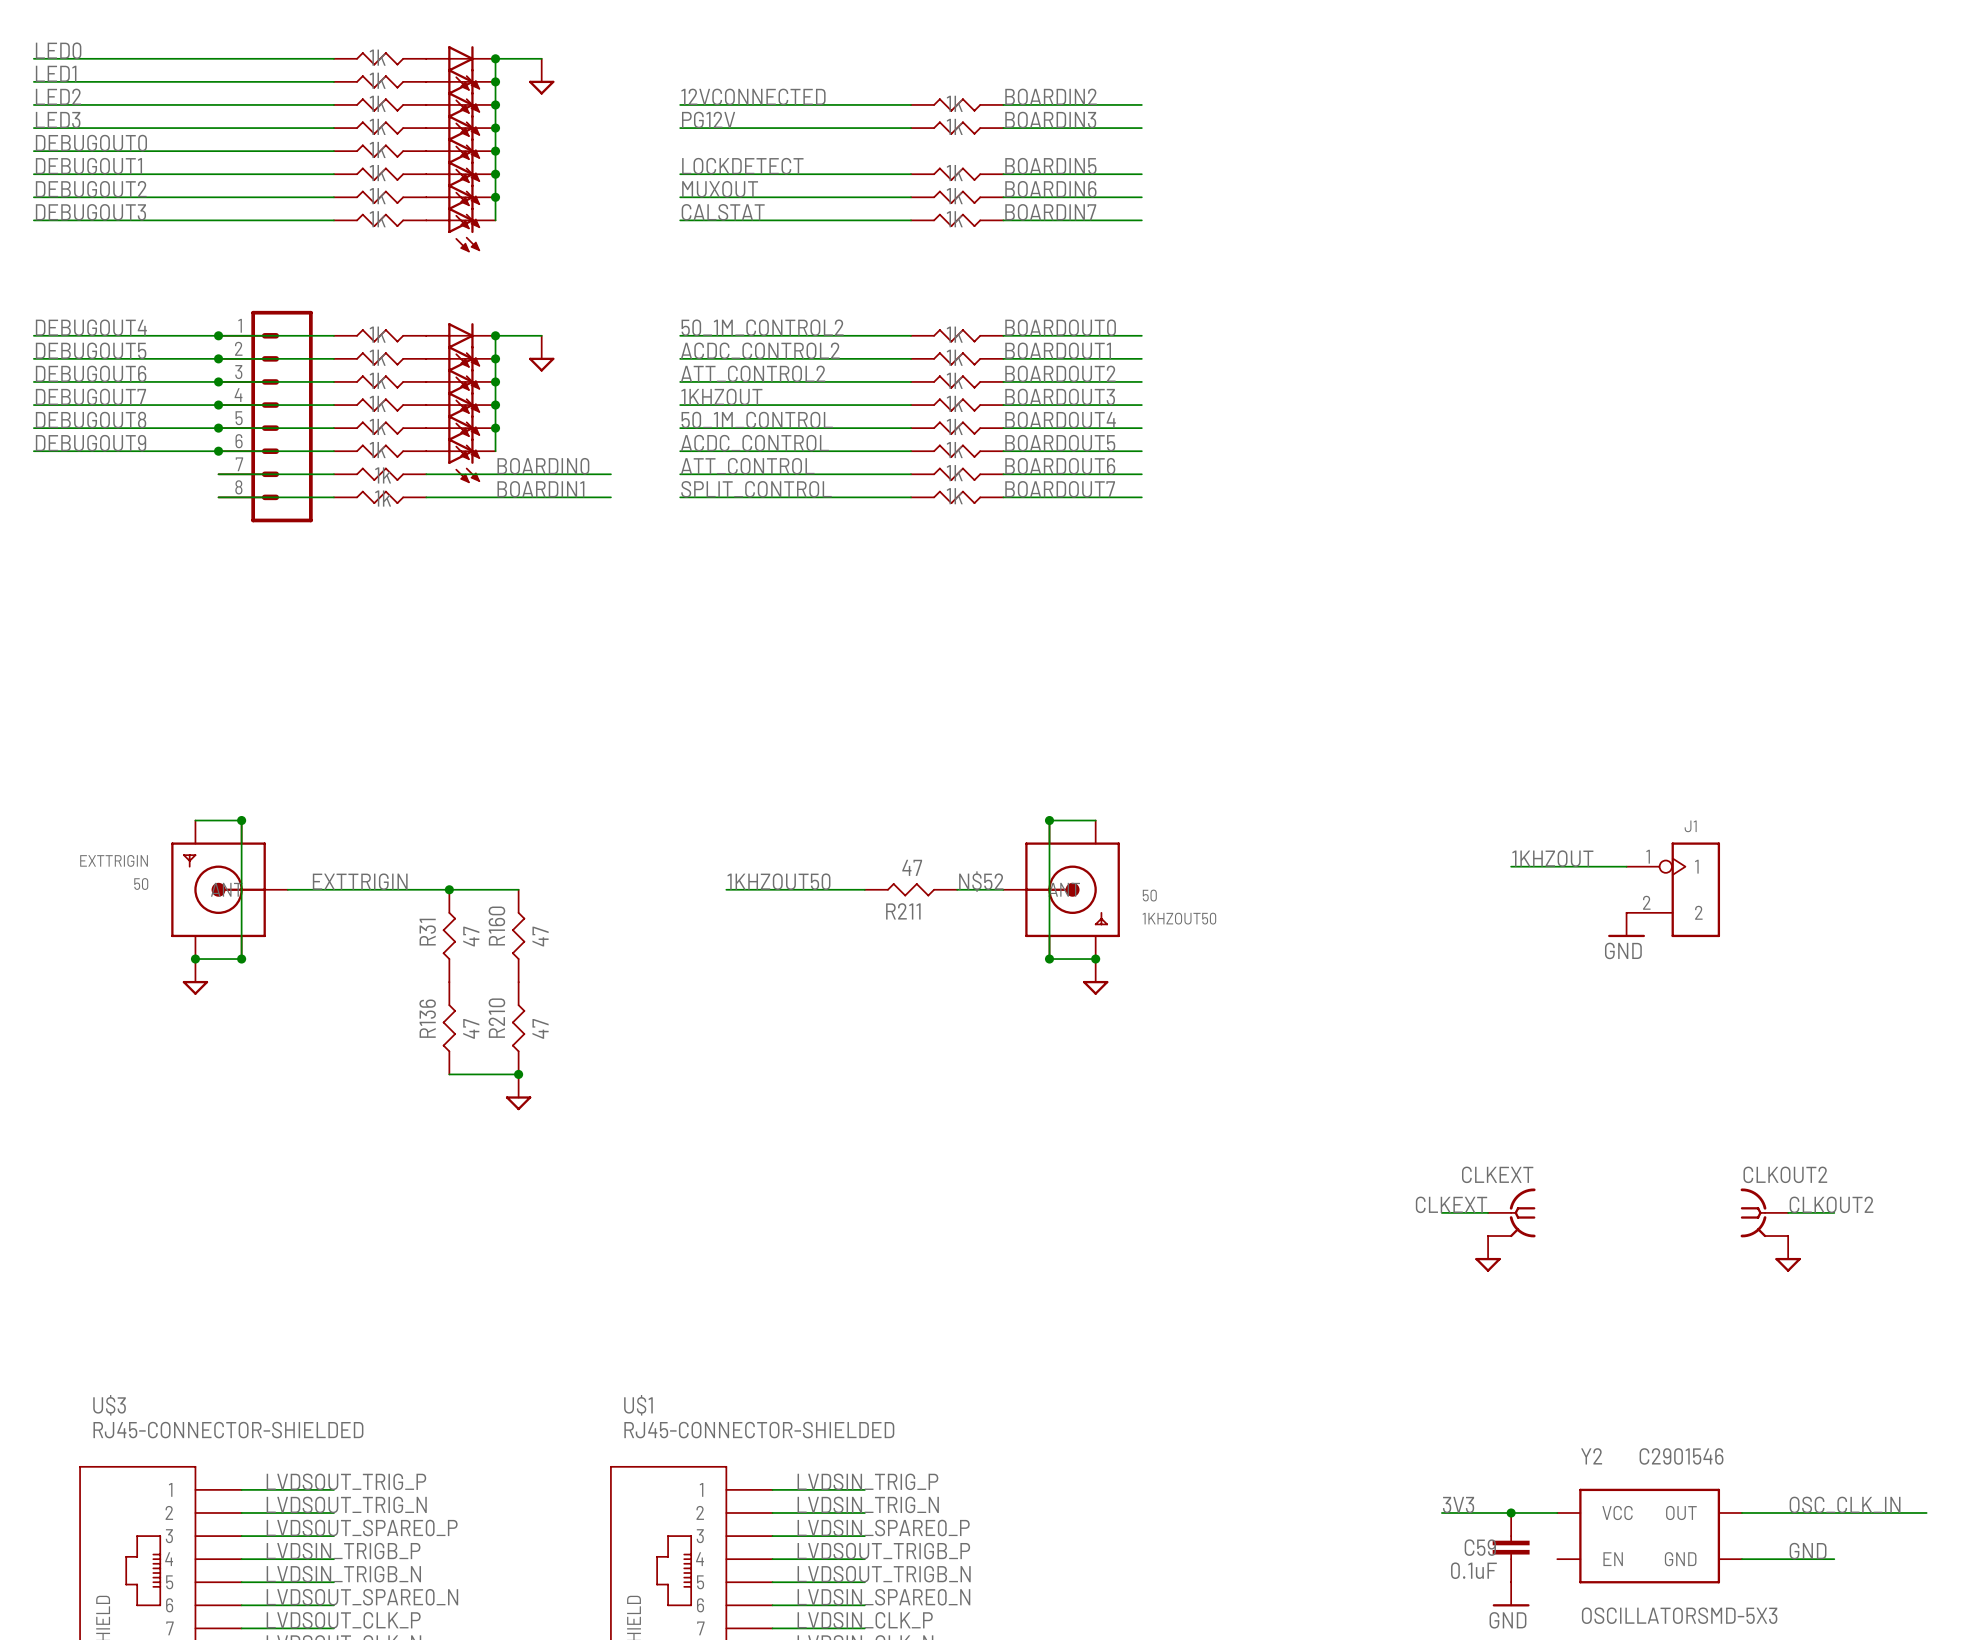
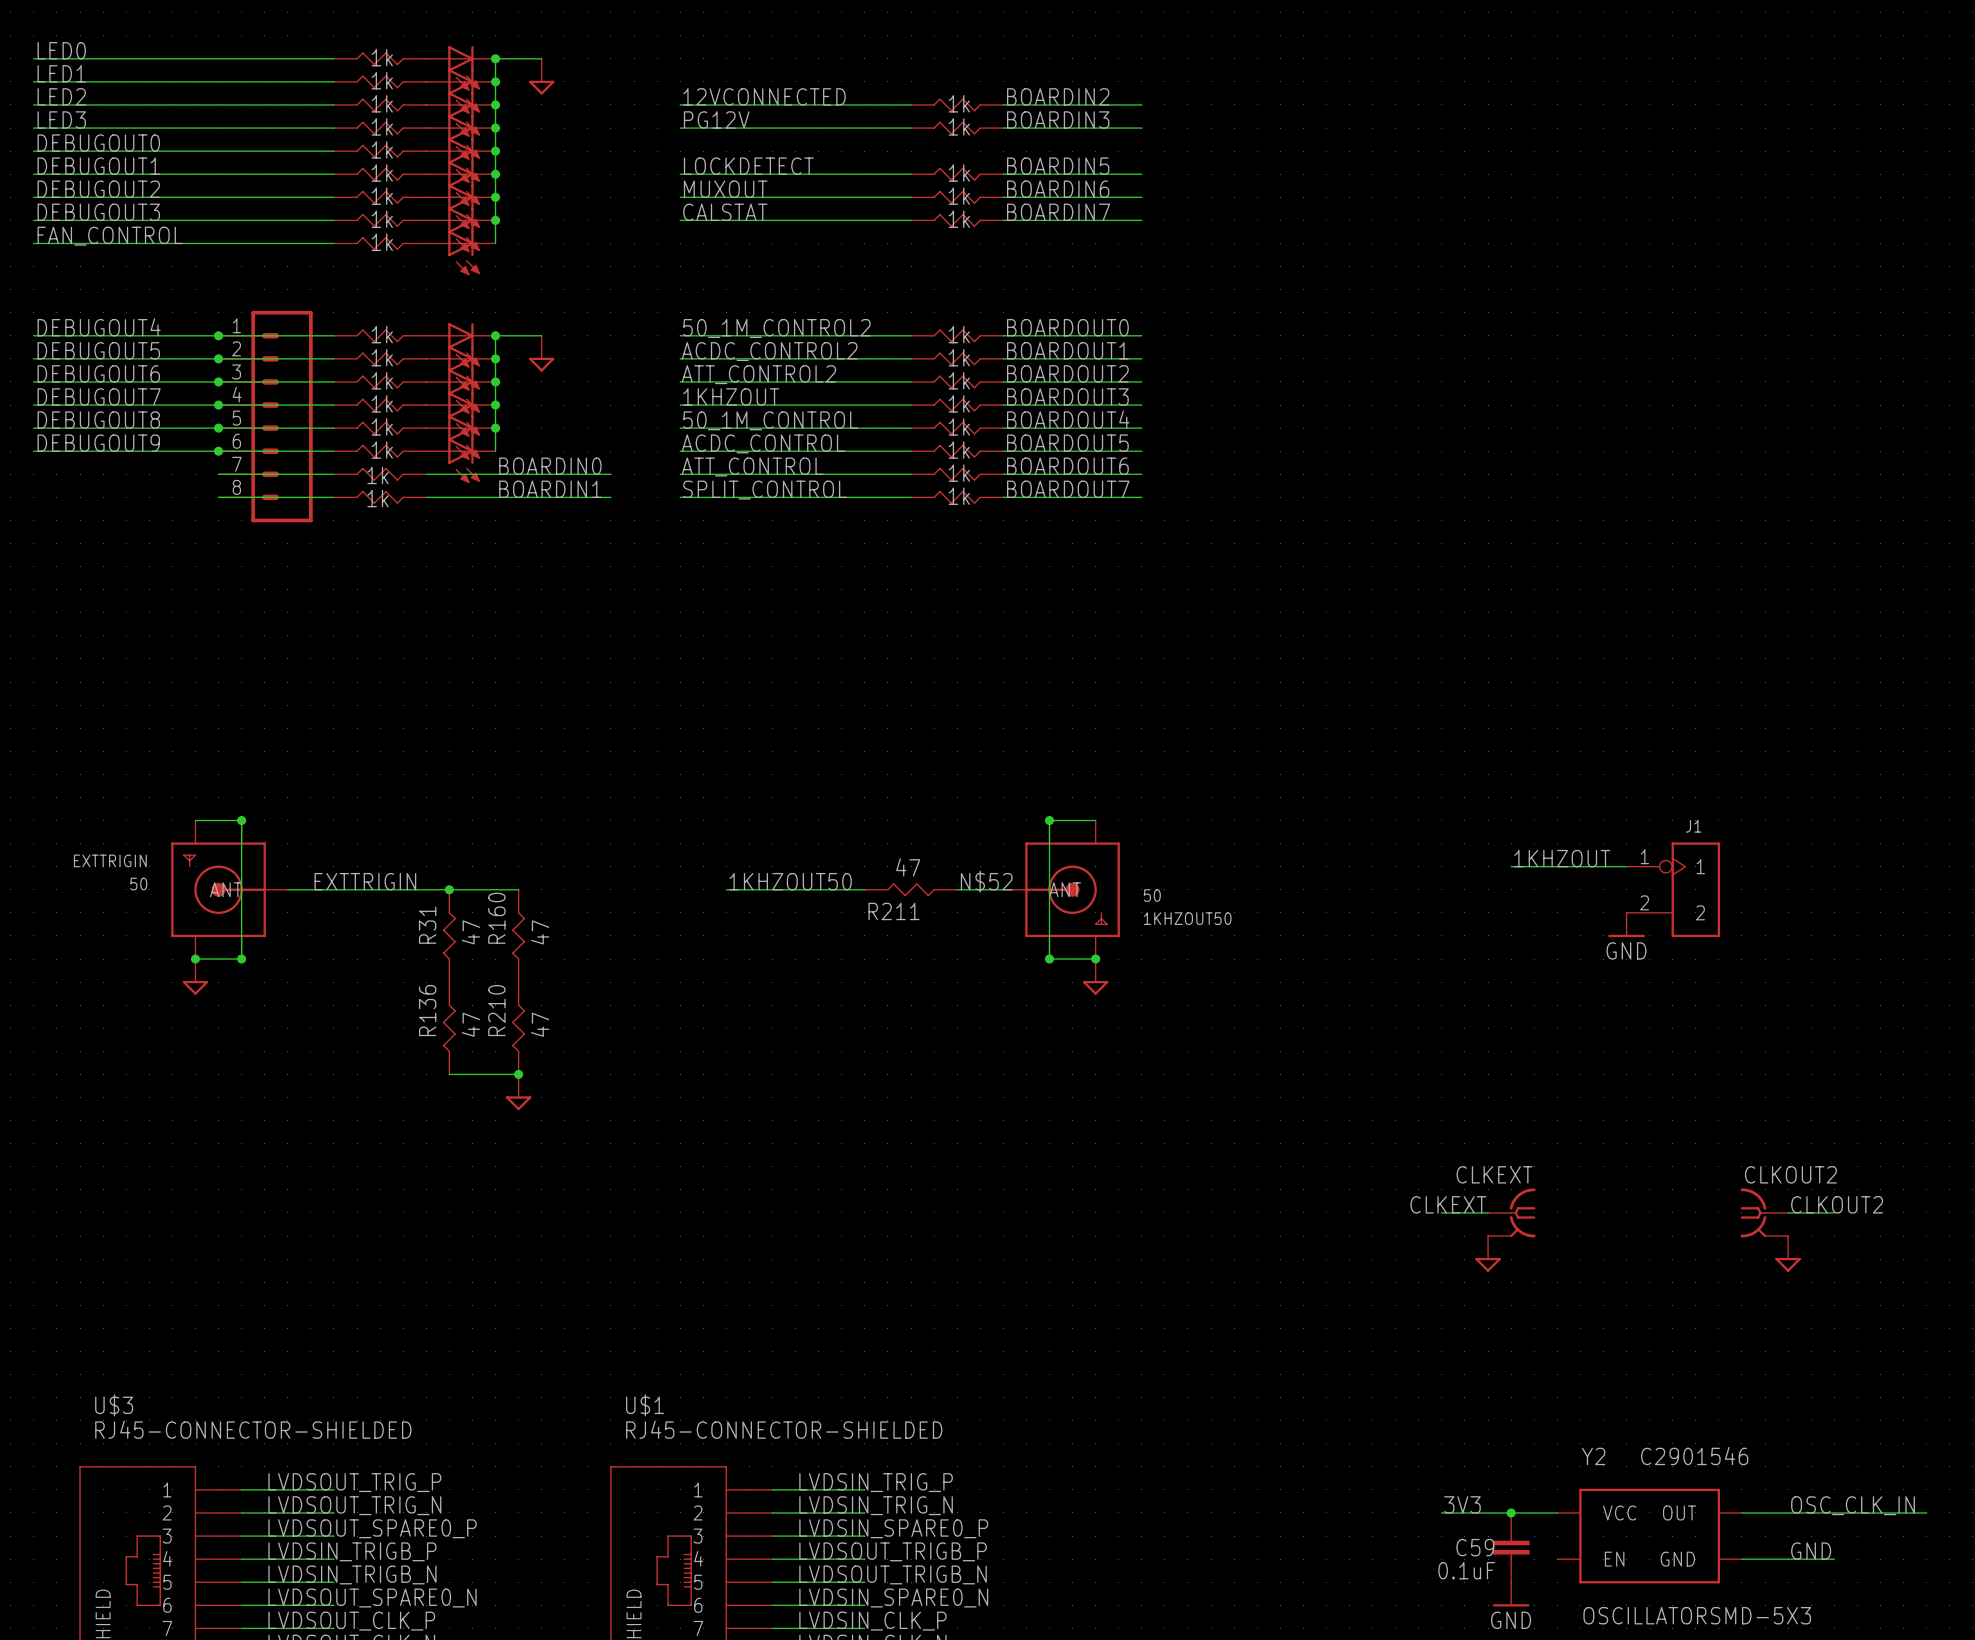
wire: none -> (495, 220) (495, 243)
junction: none -> (495, 220)
label: none -> FAN_CONTROL (110, 236)
wire: none -> (33, 243) (333, 243)
part: none -> 1k (380, 243)
part: none -> (460, 253)

